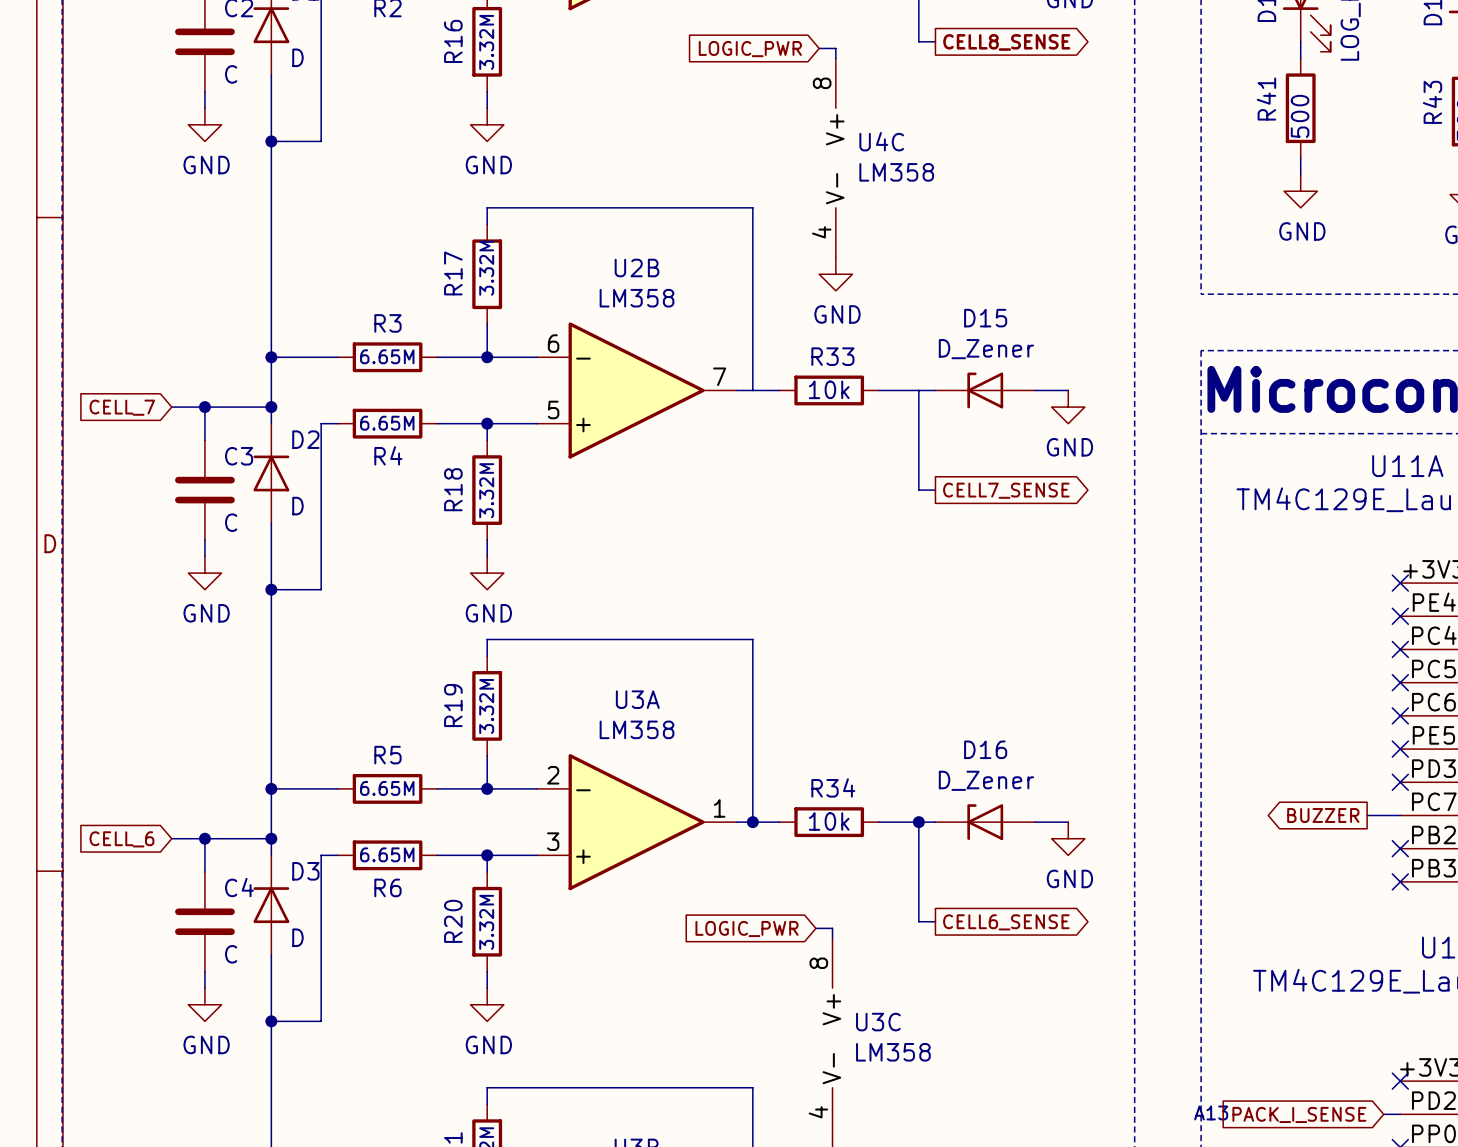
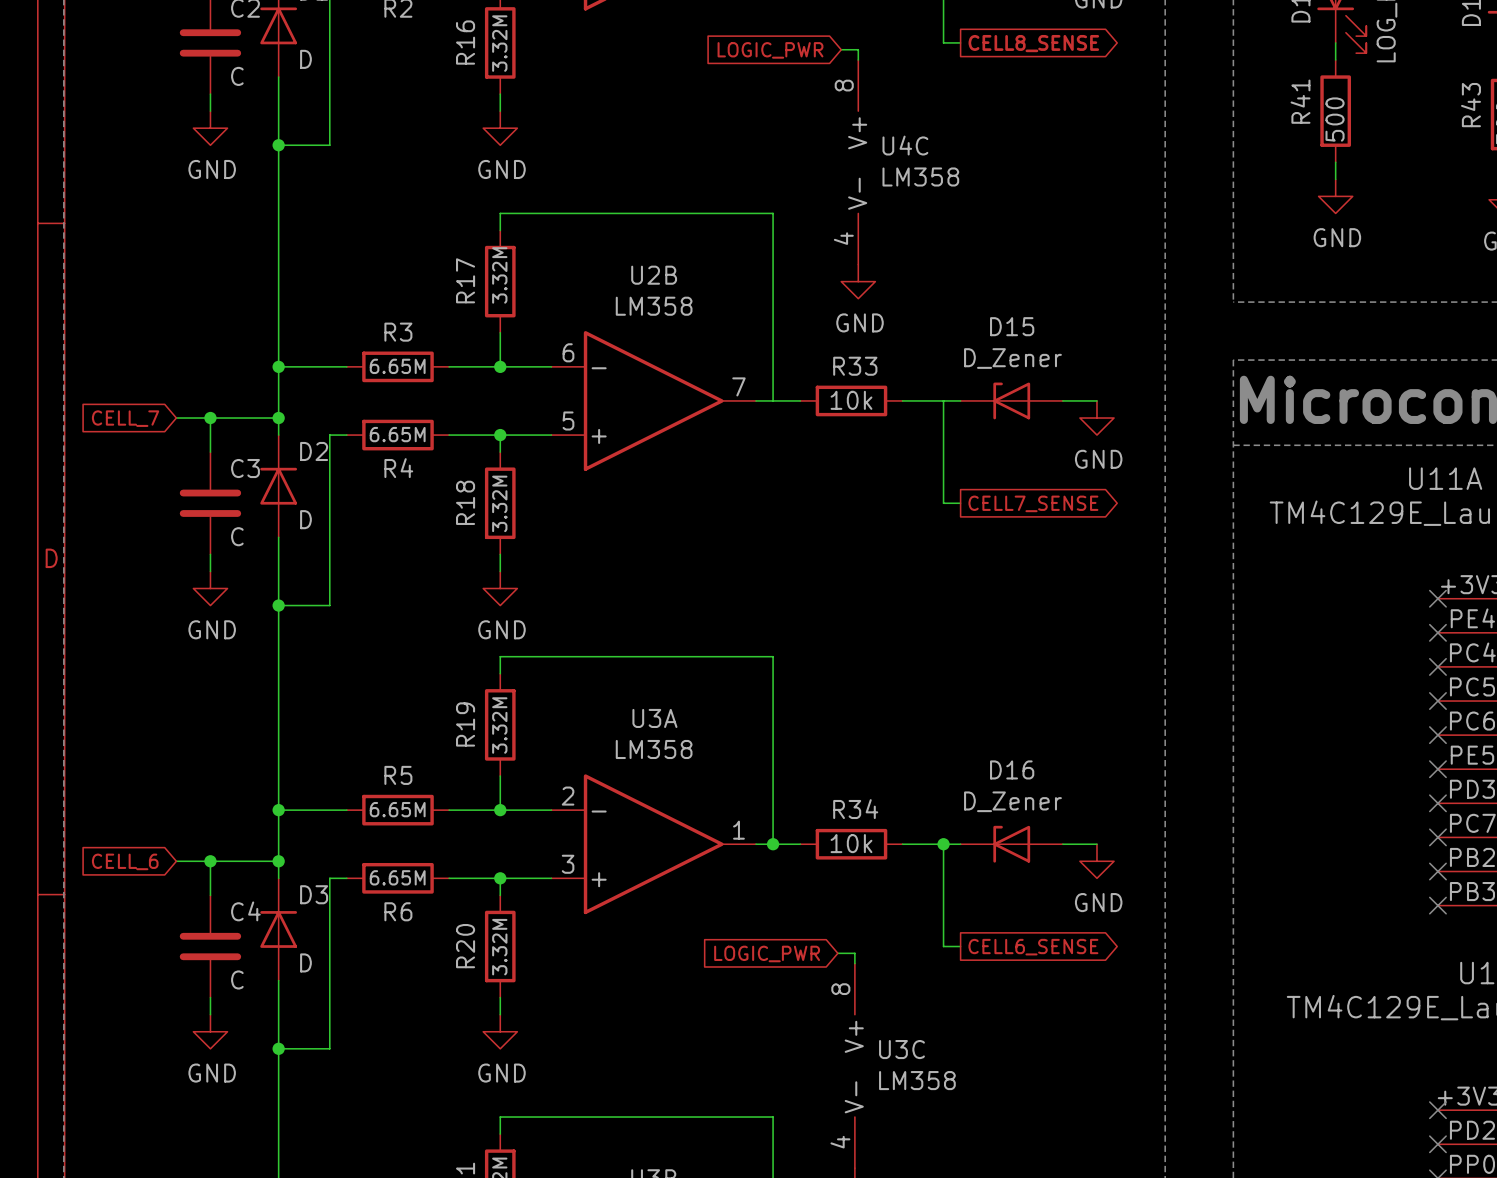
global label: BUZZER (1323, 815) -> none
wire: (1367, 815) (1400, 815) -> none
no-connect mark: none -> (1437, 837)
text: A13 (1211, 1112) -> none
global label: PACK_I_SENSE (1299, 1114) -> none
wire: (1383, 1114) (1400, 1114) -> none
no-connect mark: none -> (1437, 1144)

